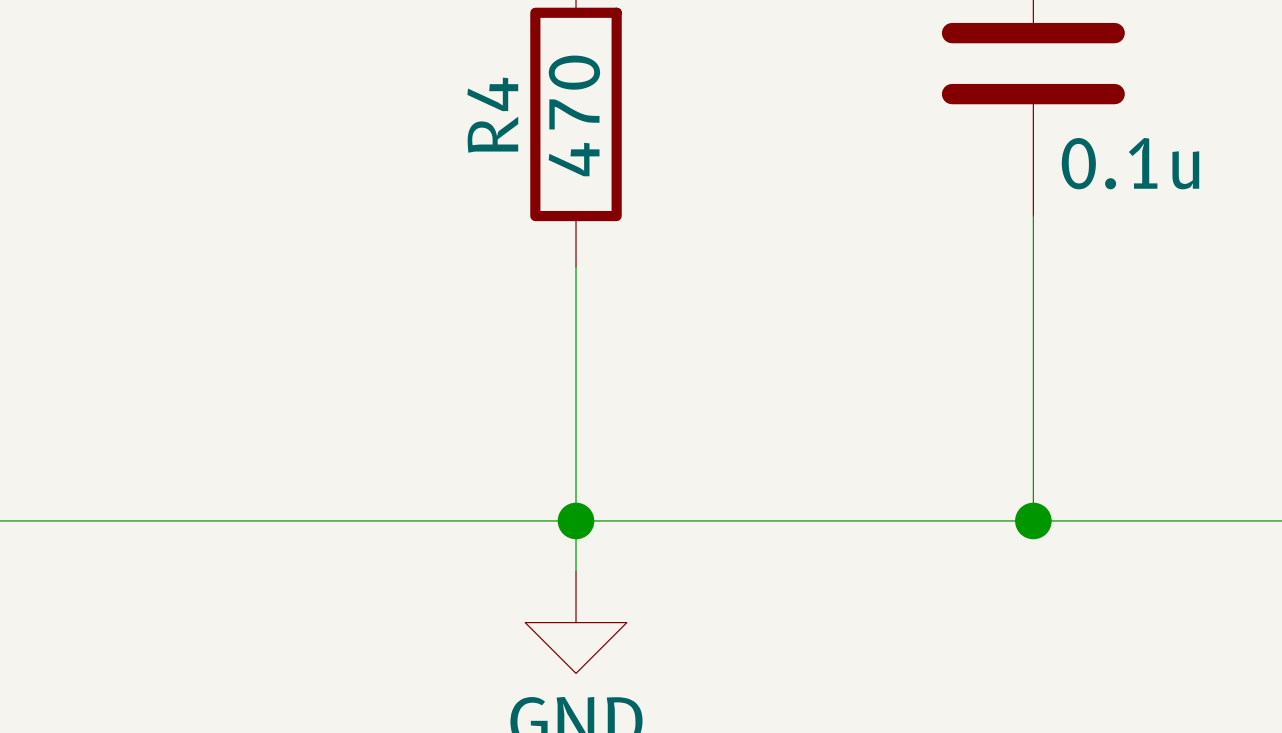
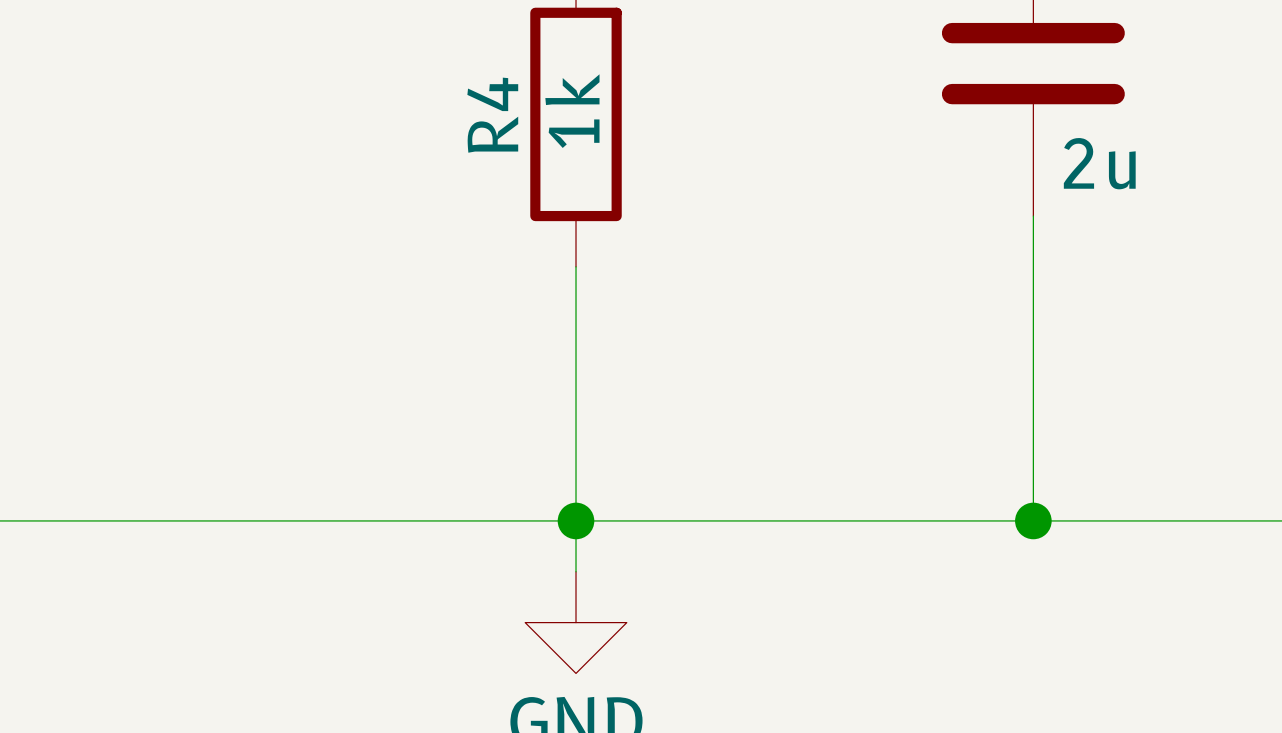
R4 value: 470 (574, 115) -> 1k (572, 111)
part value: 0.1u (1130, 163) -> 2u (1099, 163)

